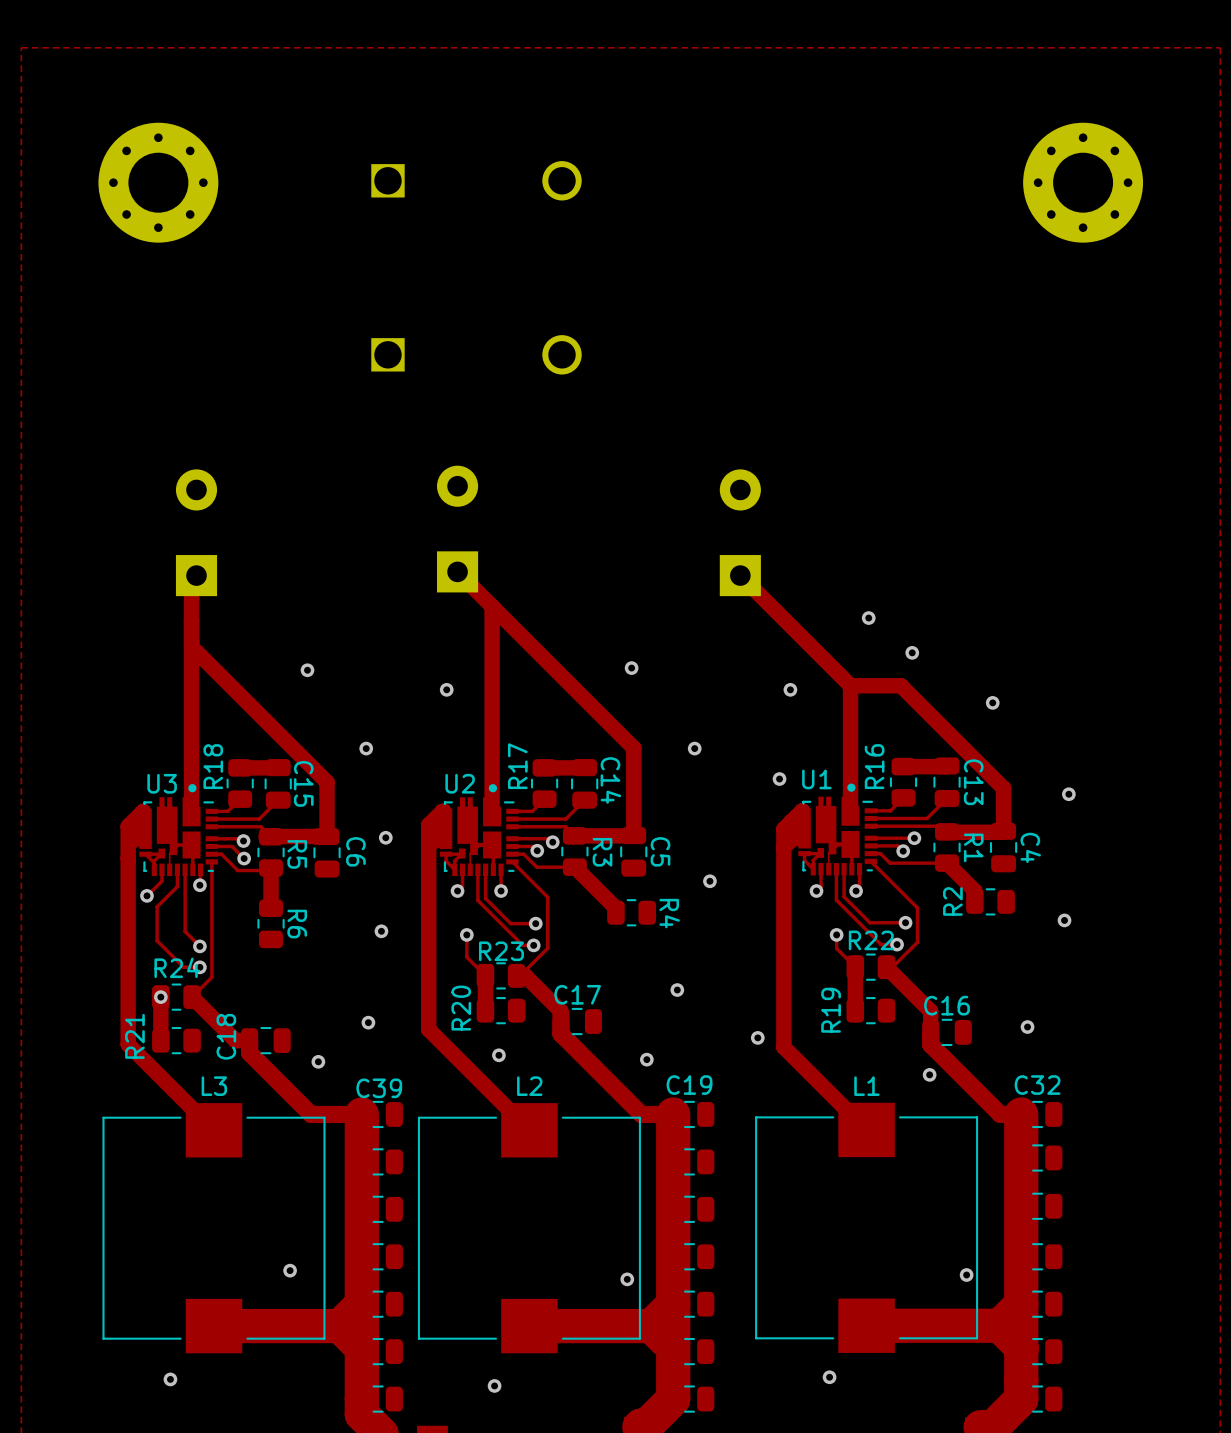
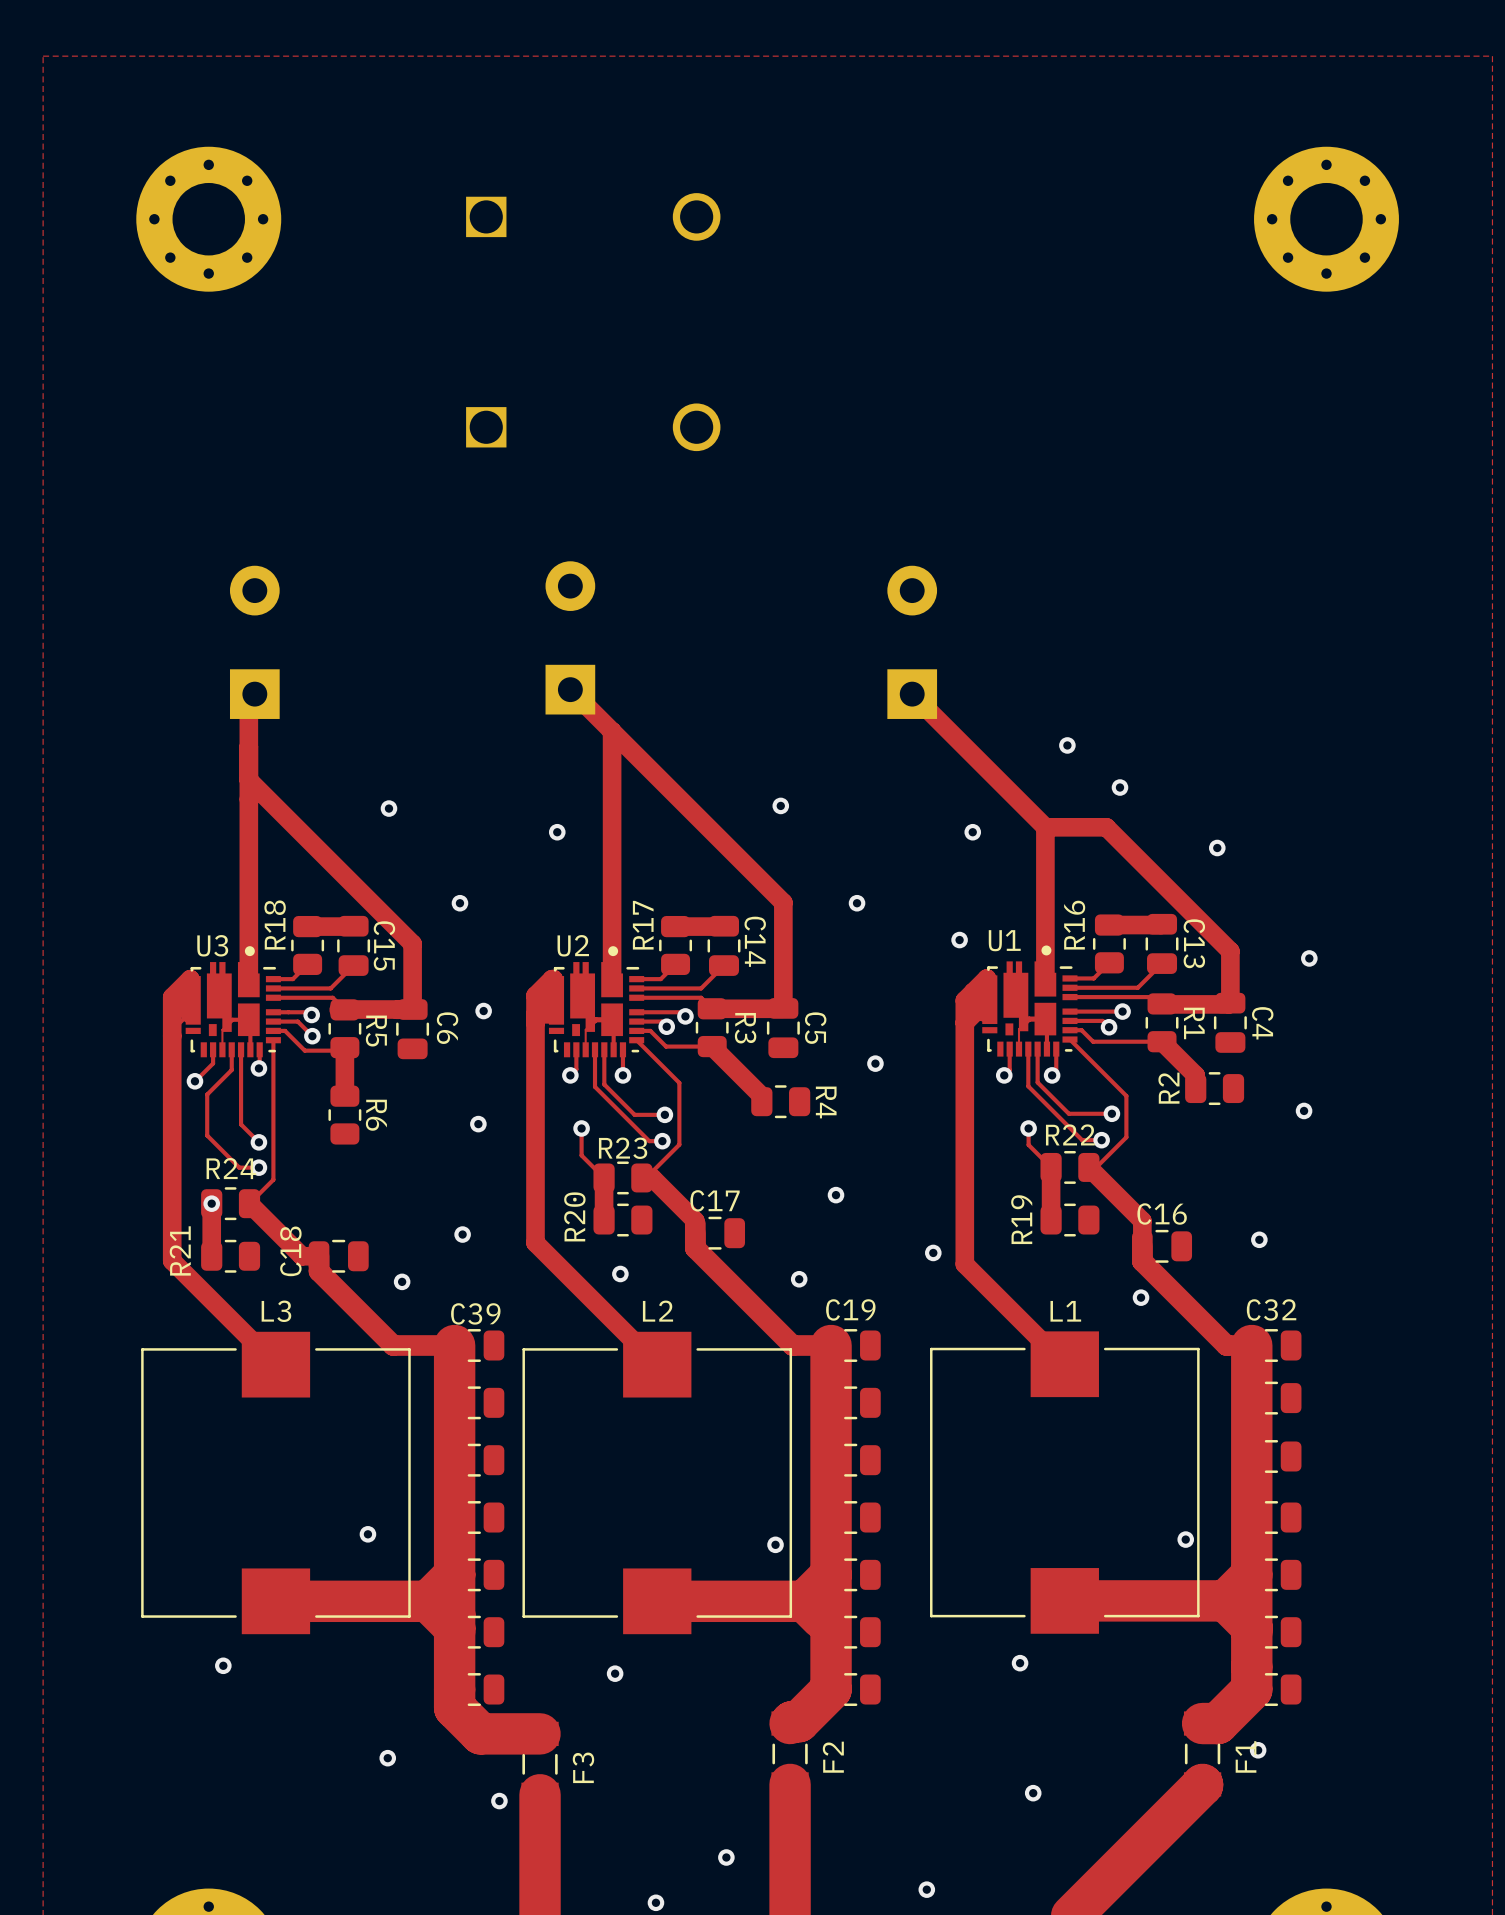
track: (804, 853) (804, 860) (813, 869) (813, 860) (820, 853) (804, 853) -> none
track: (446, 854) (461, 854) (454, 860) (454, 869) (446, 861) (446, 854) -> none
track: (154, 862) (145, 854) (161, 854) (154, 860) (154, 869) -> none

